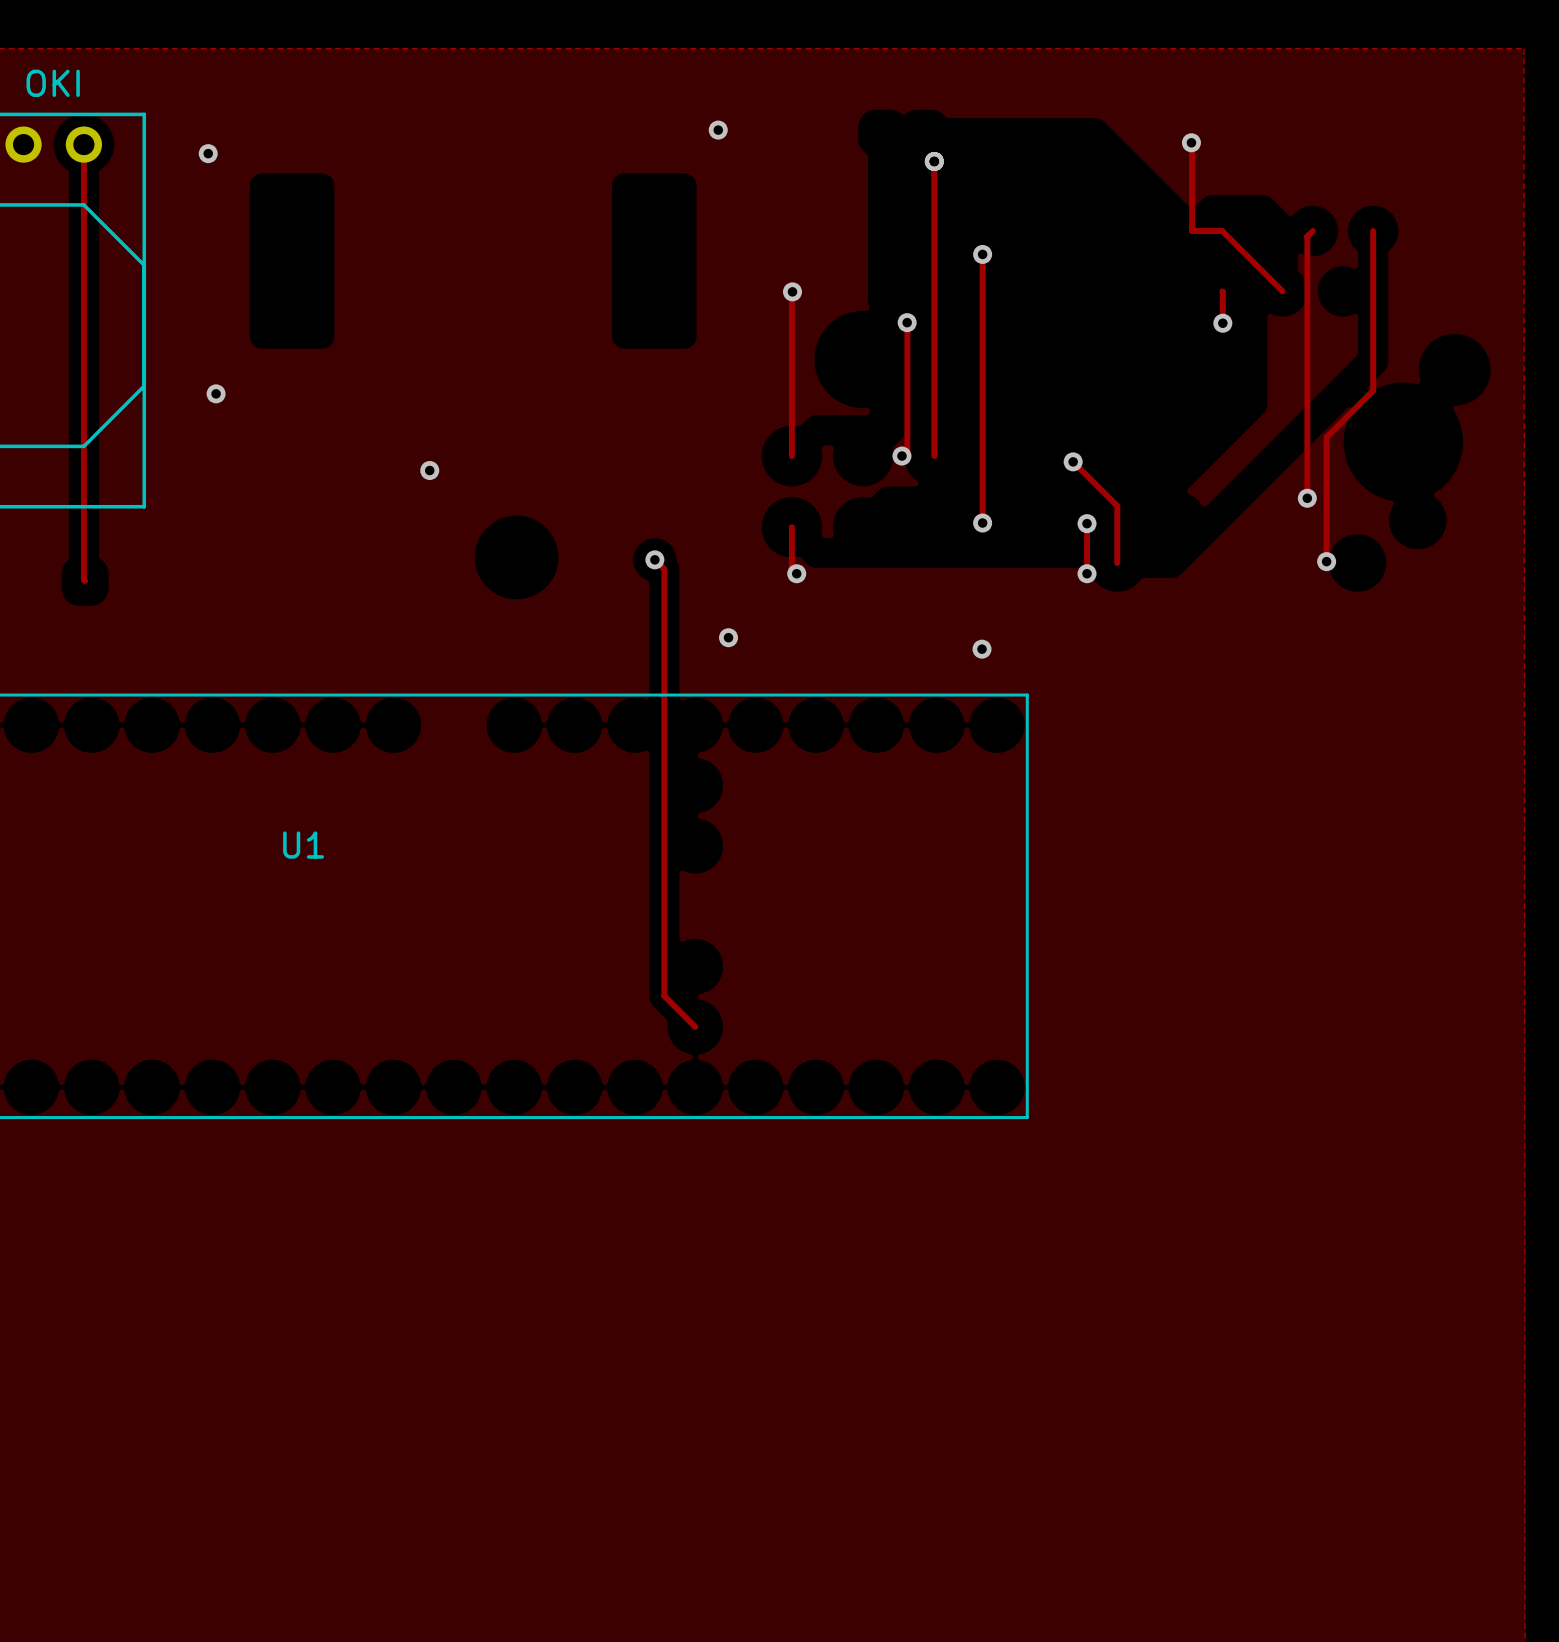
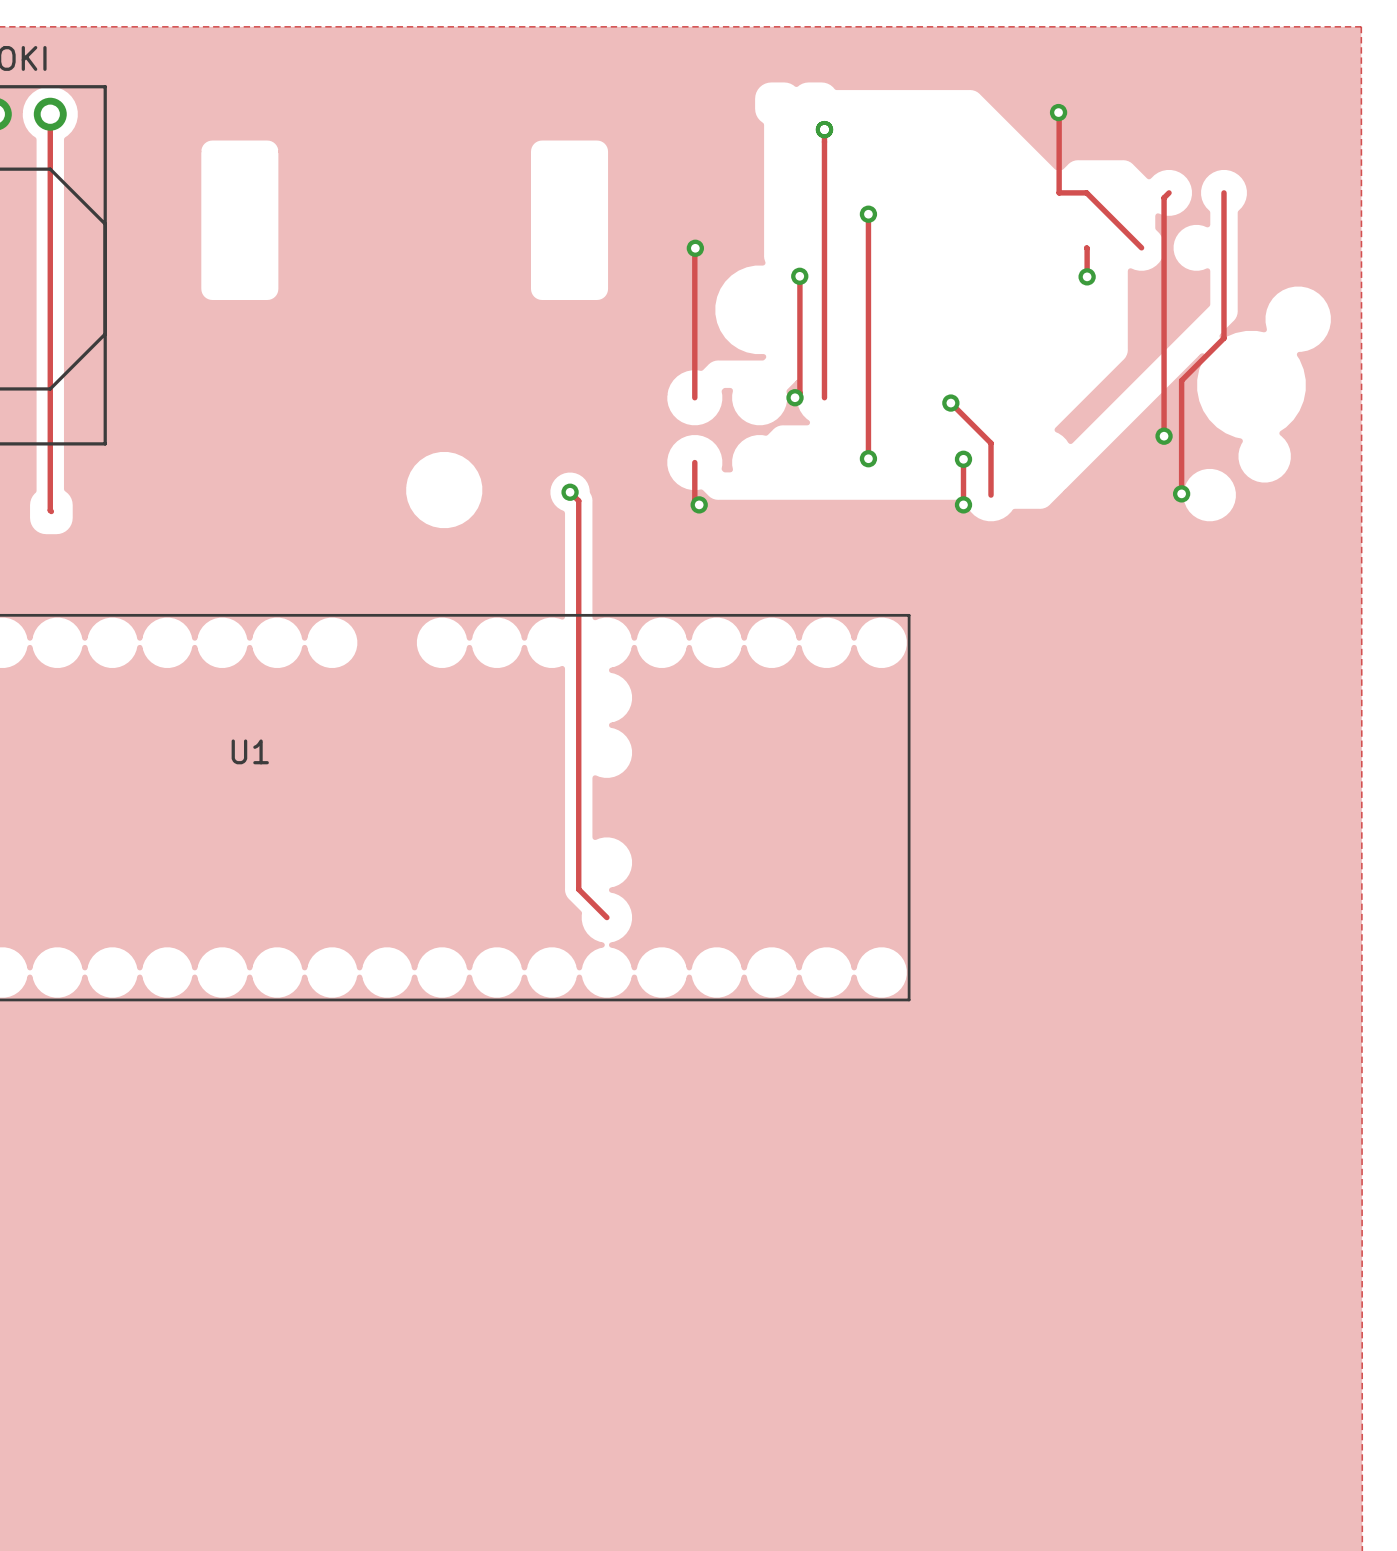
via: (718, 130) -> none
via: (208, 153) -> none
via: (216, 393) -> none
via: (429, 470) -> none
via: (728, 637) -> none
via: (982, 649) -> none

